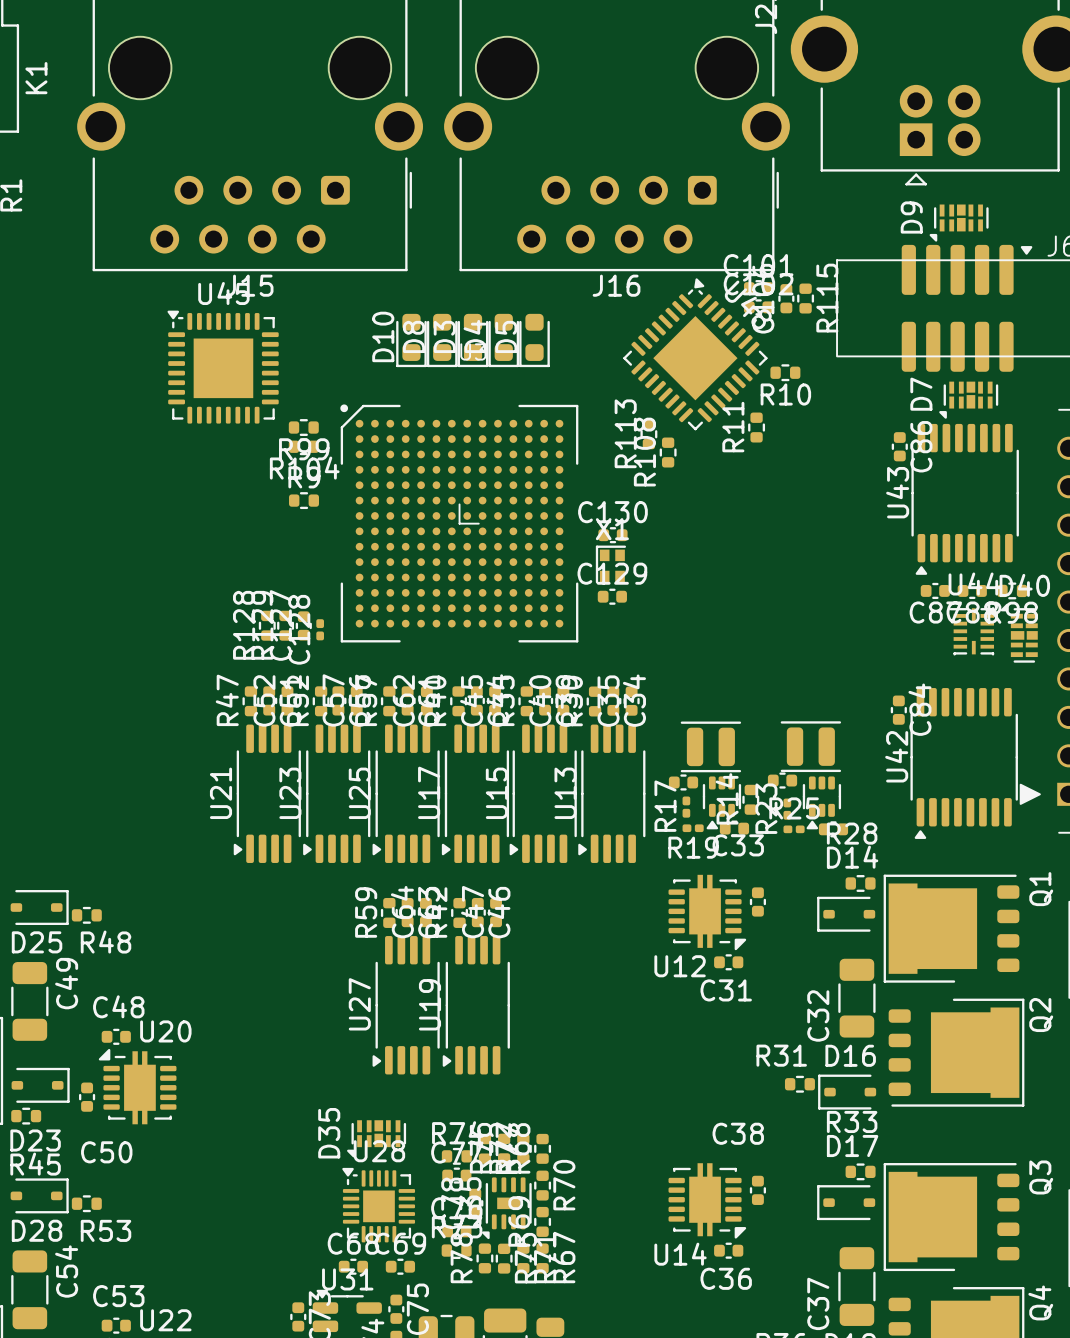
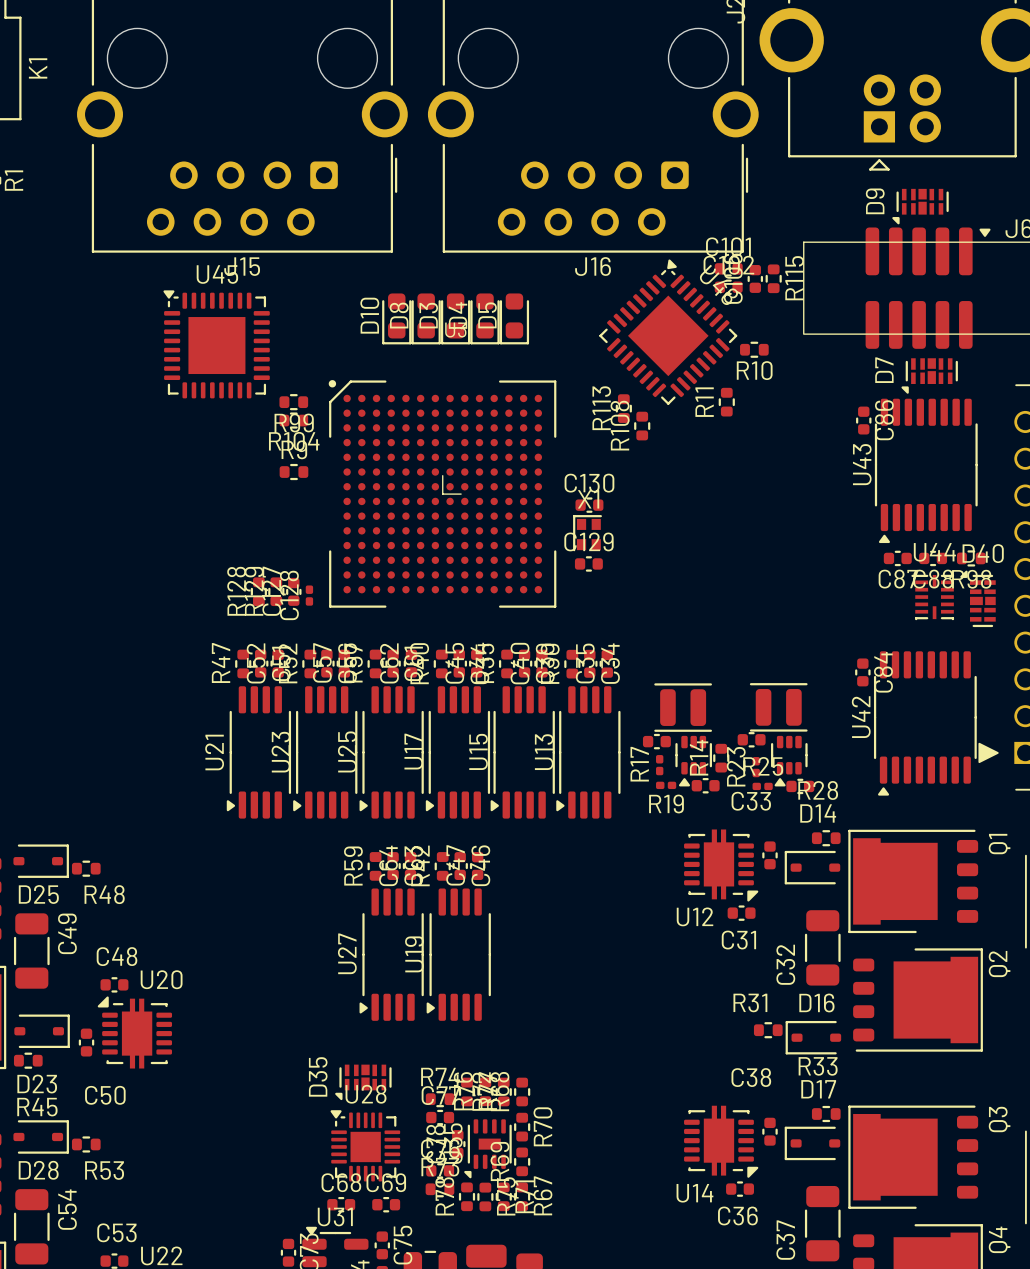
C33 position: (757, 901) -> (770, 855)
U12 position: (707, 912) -> (721, 865)
C31 position: (728, 962) -> (741, 913)
C38 position: (757, 1190) -> (770, 1131)
U14 position: (707, 1200) -> (721, 1141)
C36 position: (728, 1250) -> (740, 1189)

